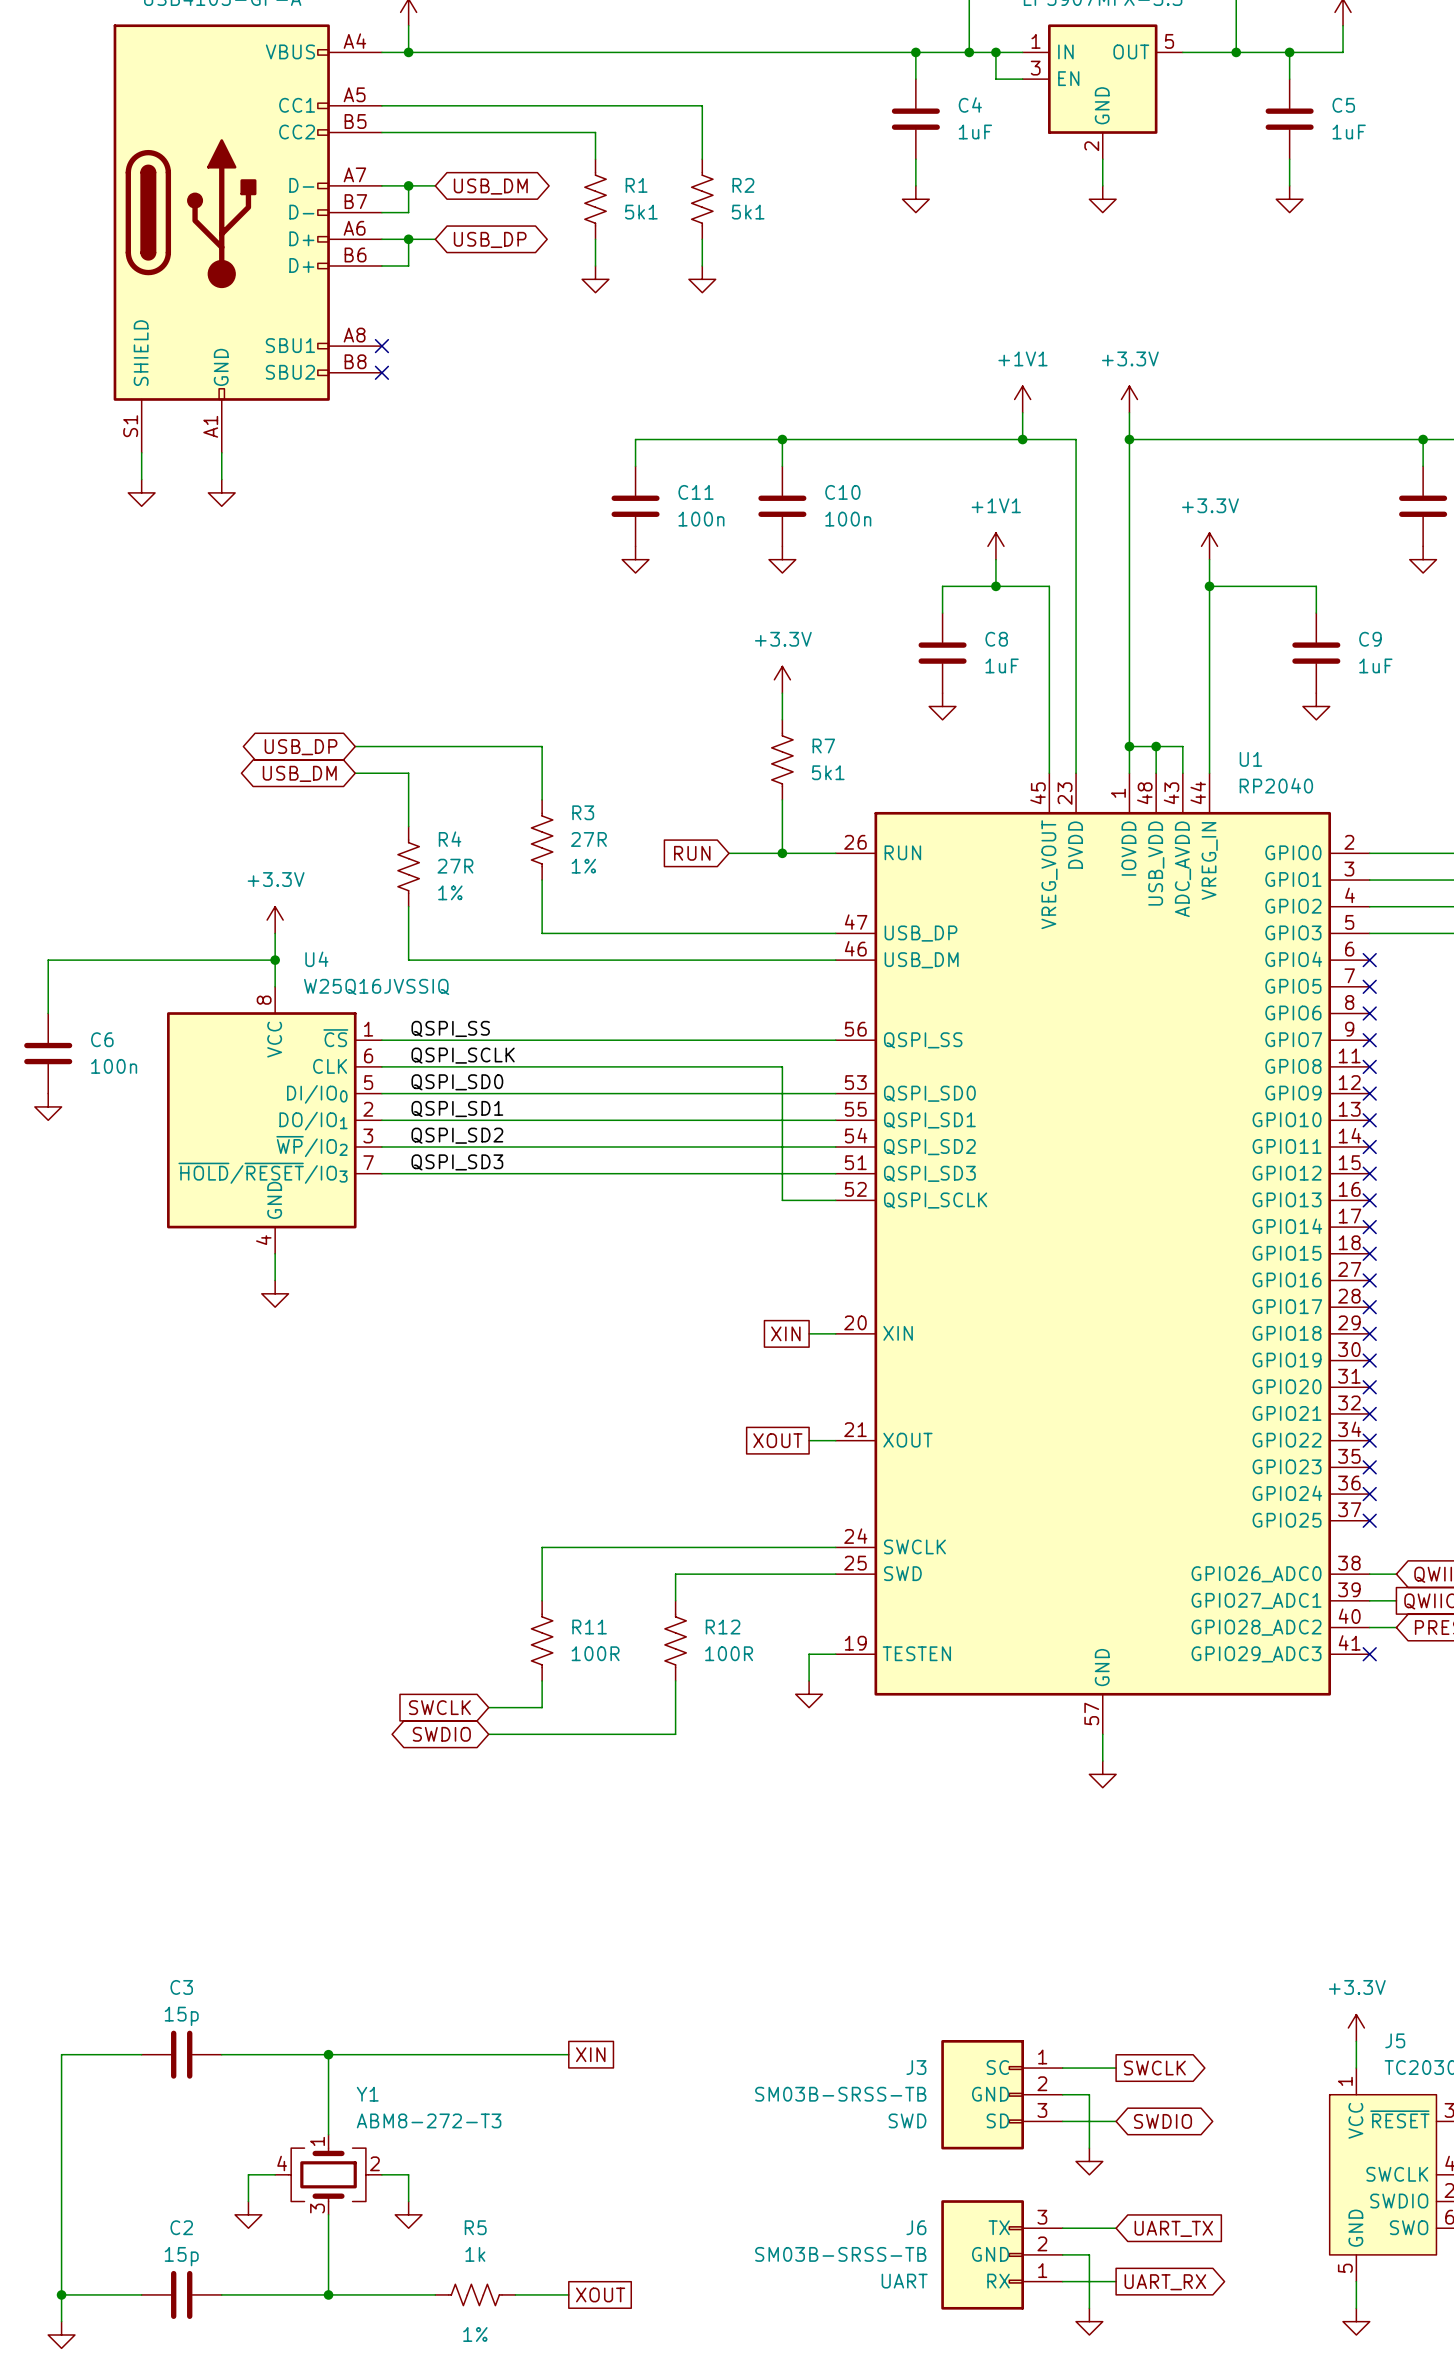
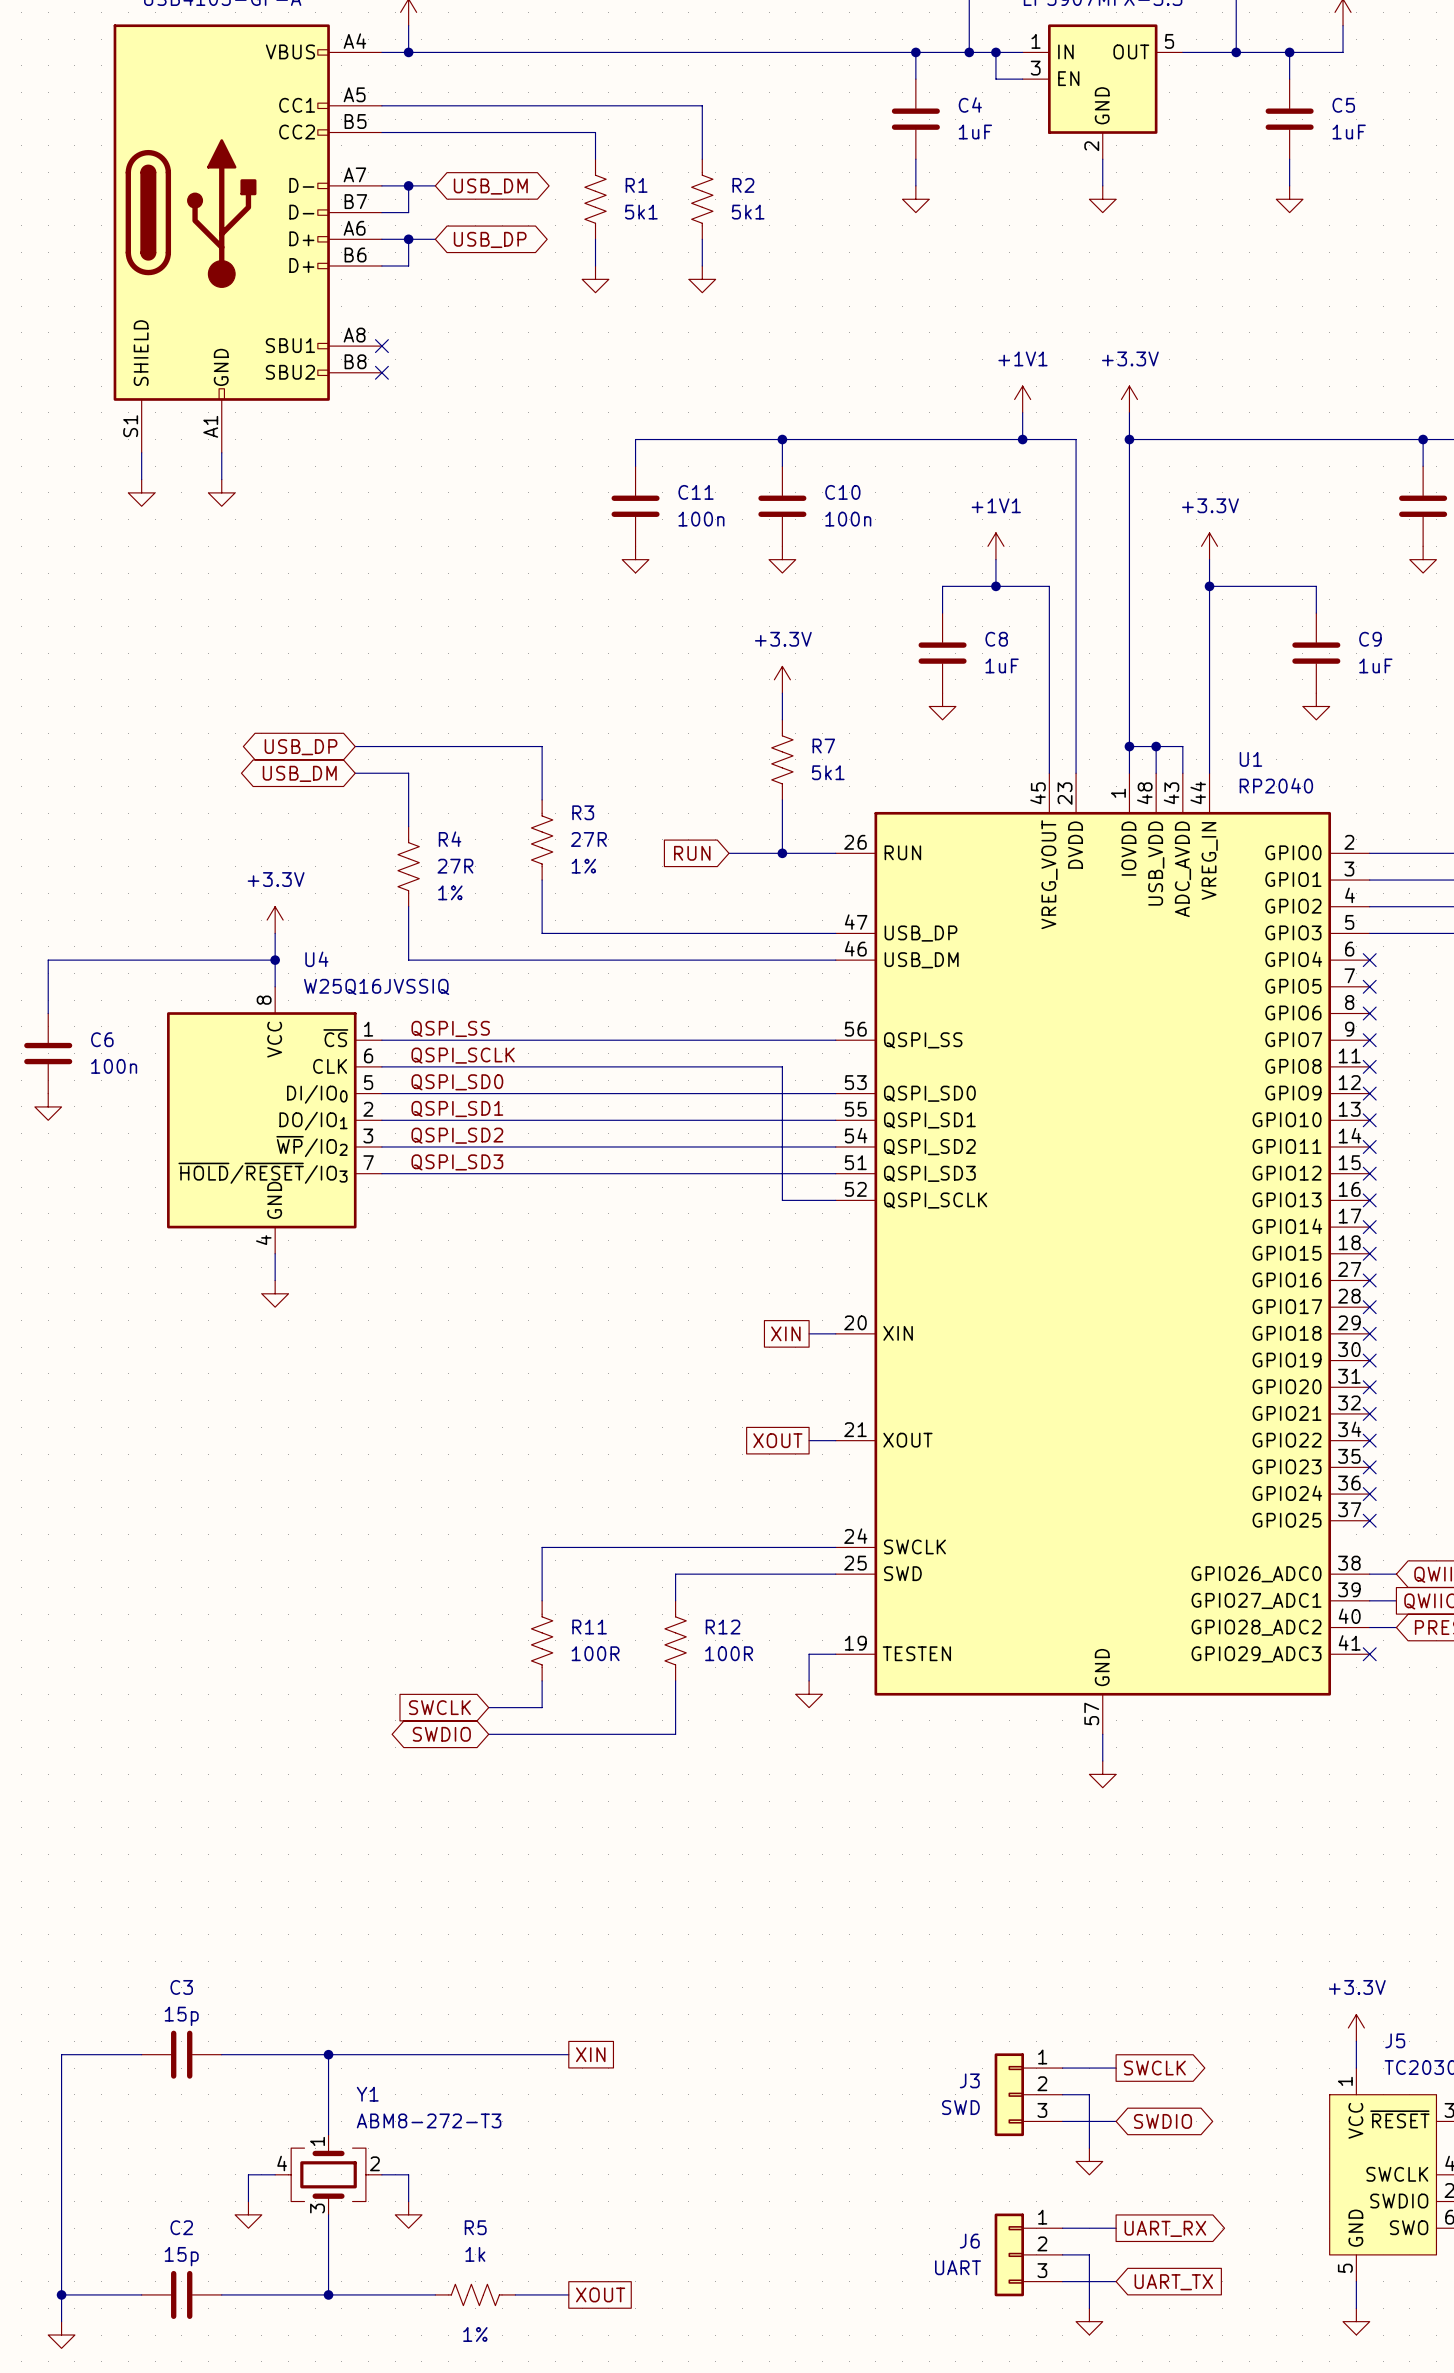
J3 symbol: [941, 2040, 1063, 2150] -> [994, 2053, 1063, 2137]
J3 name position: J3 (916, 2067) -> J3 (969, 2080)
J3 value: SM03B-SRSS-TB (840, 2094) -> SWD (960, 2107)
J3 text: SWD (907, 2120) -> none
J6 symbol: [941, 2200, 1063, 2310] -> [994, 2213, 1063, 2297]
J6 name position: J6 (916, 2227) -> J6 (969, 2241)
global label shape: input (1173, 2228) -> output (1165, 2228)
global label: UART_TX (1173, 2228) -> UART_RX (1165, 2228)
J6 value: SM03B-SRSS-TB (840, 2254) -> UART (958, 2267)
J6 text: UART (904, 2281) -> none
global label shape: output (1165, 2282) -> input (1173, 2282)
global label: UART_RX (1165, 2282) -> UART_TX (1173, 2282)

